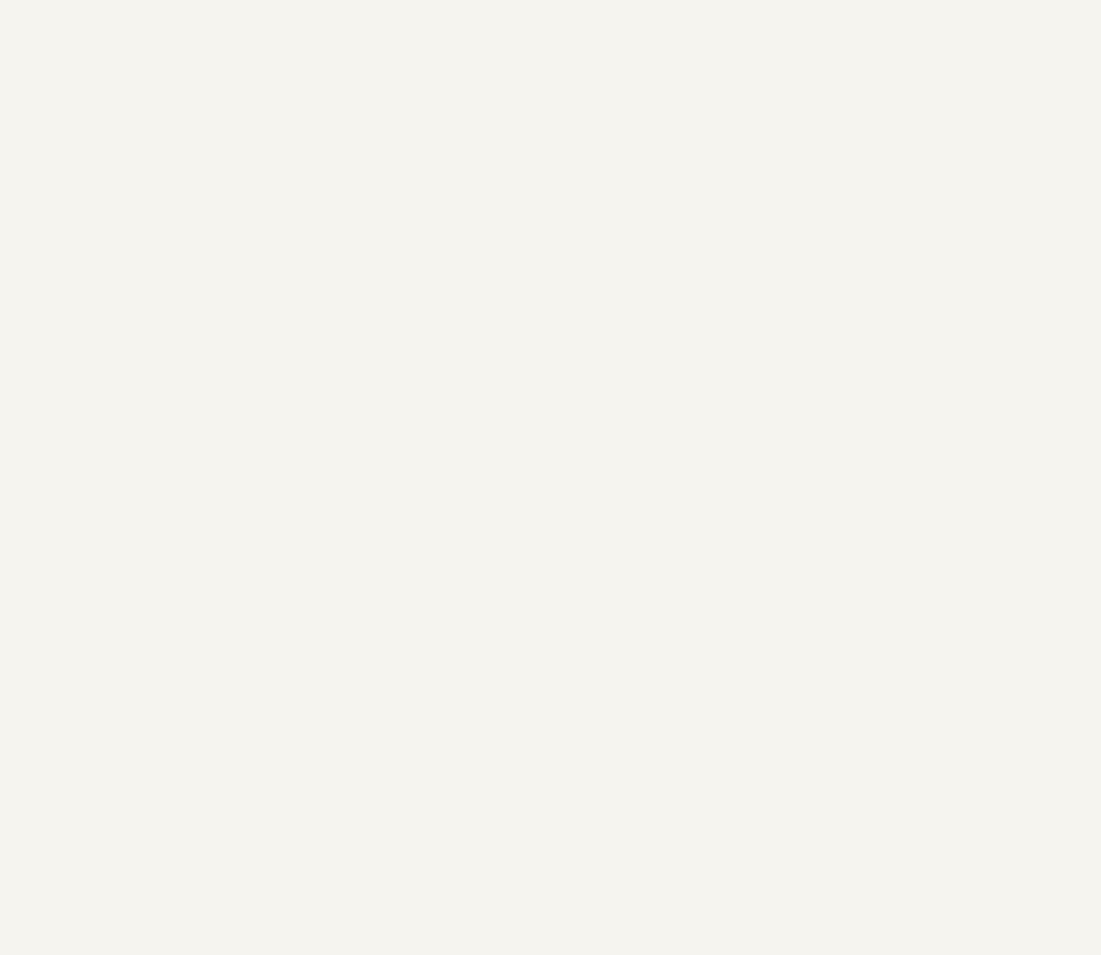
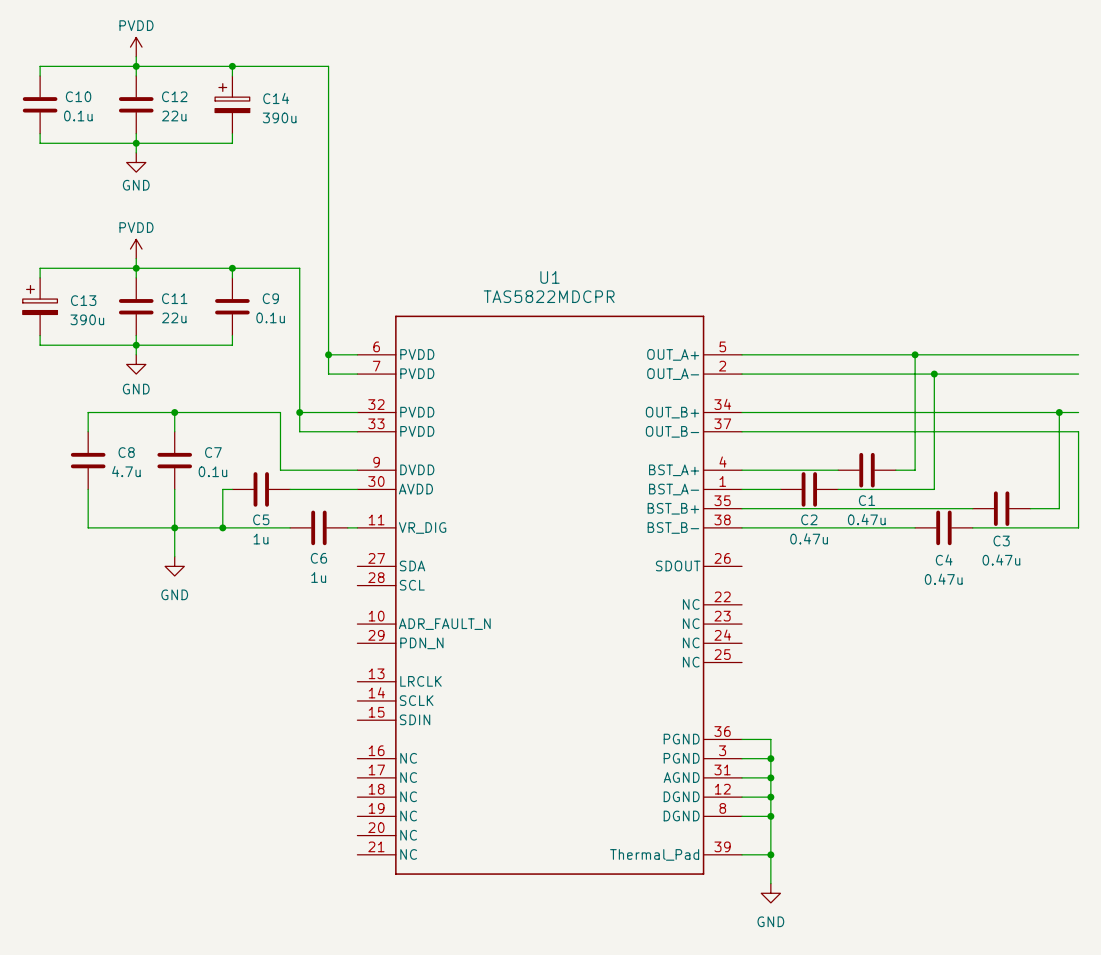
power symbol: none -> PVDD (136, 47)
wire: none -> (136, 56) (136, 75)
junction: none -> (136, 66)
wire: none -> (232, 66) (232, 75)
junction: none -> (232, 66)
wire: none -> (40, 75) (40, 66) (328, 66) (328, 374) (357, 374)
C10: none -> 0.1u (40, 104)
C12: none -> 22u (136, 104)
C14: none -> 390u (232, 104)
wire: none -> (40, 133) (40, 143) (232, 143) (232, 133)
wire: none -> (136, 133) (136, 152)
junction: none -> (136, 143)
power symbol: none -> GND (136, 162)
power symbol: none -> PVDD (136, 249)
wire: none -> (136, 258) (136, 277)
junction: none -> (136, 268)
wire: none -> (232, 268) (232, 277)
junction: none -> (232, 268)
wire: none -> (40, 277) (40, 268) (299, 268) (299, 431) (357, 431)
C13: none -> 390u (40, 306)
C11: none -> 22u (136, 306)
C9: none -> 0.1u (232, 306)
wire: none -> (40, 335) (40, 345) (232, 345) (232, 335)
wire: none -> (136, 335) (136, 354)
junction: none -> (136, 345)
wire: none -> (328, 354) (357, 354)
junction: none -> (328, 354)
wire: none -> (742, 354) (1078, 354)
wire: none -> (915, 354) (915, 470) (895, 470)
junction: none -> (915, 354)
power symbol: none -> GND (136, 364)
wire: none -> (742, 374) (1078, 374)
wire: none -> (934, 374) (934, 489) (838, 489)
junction: none -> (934, 374)
wire: none -> (174, 412) (174, 431)
junction: none -> (174, 412)
wire: none -> (299, 412) (357, 412)
junction: none -> (299, 412)
wire: none -> (742, 412) (1078, 412)
wire: none -> (1059, 412) (1059, 508) (1030, 508)
junction: none -> (1059, 412)
wire: none -> (88, 431) (88, 412) (280, 412) (280, 470) (357, 470)
wire: none -> (742, 431) (1078, 431) (1078, 527) (972, 527)
C8: none -> 4.7u (88, 460)
C7: none -> 0.1u (174, 460)
wire: none -> (742, 470) (838, 470)
C1: none -> 0.47u (867, 470)
wire: none -> (88, 489) (88, 527) (290, 527)
wire: none -> (174, 489) (174, 556)
wire: none -> (232, 489) (222, 489) (222, 527)
C5: none -> 1u (261, 489)
wire: none -> (290, 489) (357, 489)
wire: none -> (742, 489) (780, 489)
C2: none -> 0.47u (809, 489)
wire: none -> (742, 508) (972, 508)
C3: none -> 0.47u (1001, 508)
junction: none -> (174, 527)
junction: none -> (222, 527)
C6: none -> 1u (318, 527)
wire: none -> (347, 527) (357, 527)
wire: none -> (742, 527) (915, 527)
C4: none -> 0.47u (943, 527)
power symbol: none -> GND (174, 566)
U1: none -> TAS5822MDCPR (549, 595)
wire: none -> (742, 739) (770, 739) (770, 883)
wire: none -> (742, 758) (770, 758)
junction: none -> (770, 758)
wire: none -> (742, 777) (770, 777)
junction: none -> (770, 777)
wire: none -> (742, 797) (770, 797)
junction: none -> (770, 797)
wire: none -> (742, 816) (770, 816)
junction: none -> (770, 816)
wire: none -> (742, 854) (770, 854)
junction: none -> (770, 854)
power symbol: none -> GND (770, 893)

